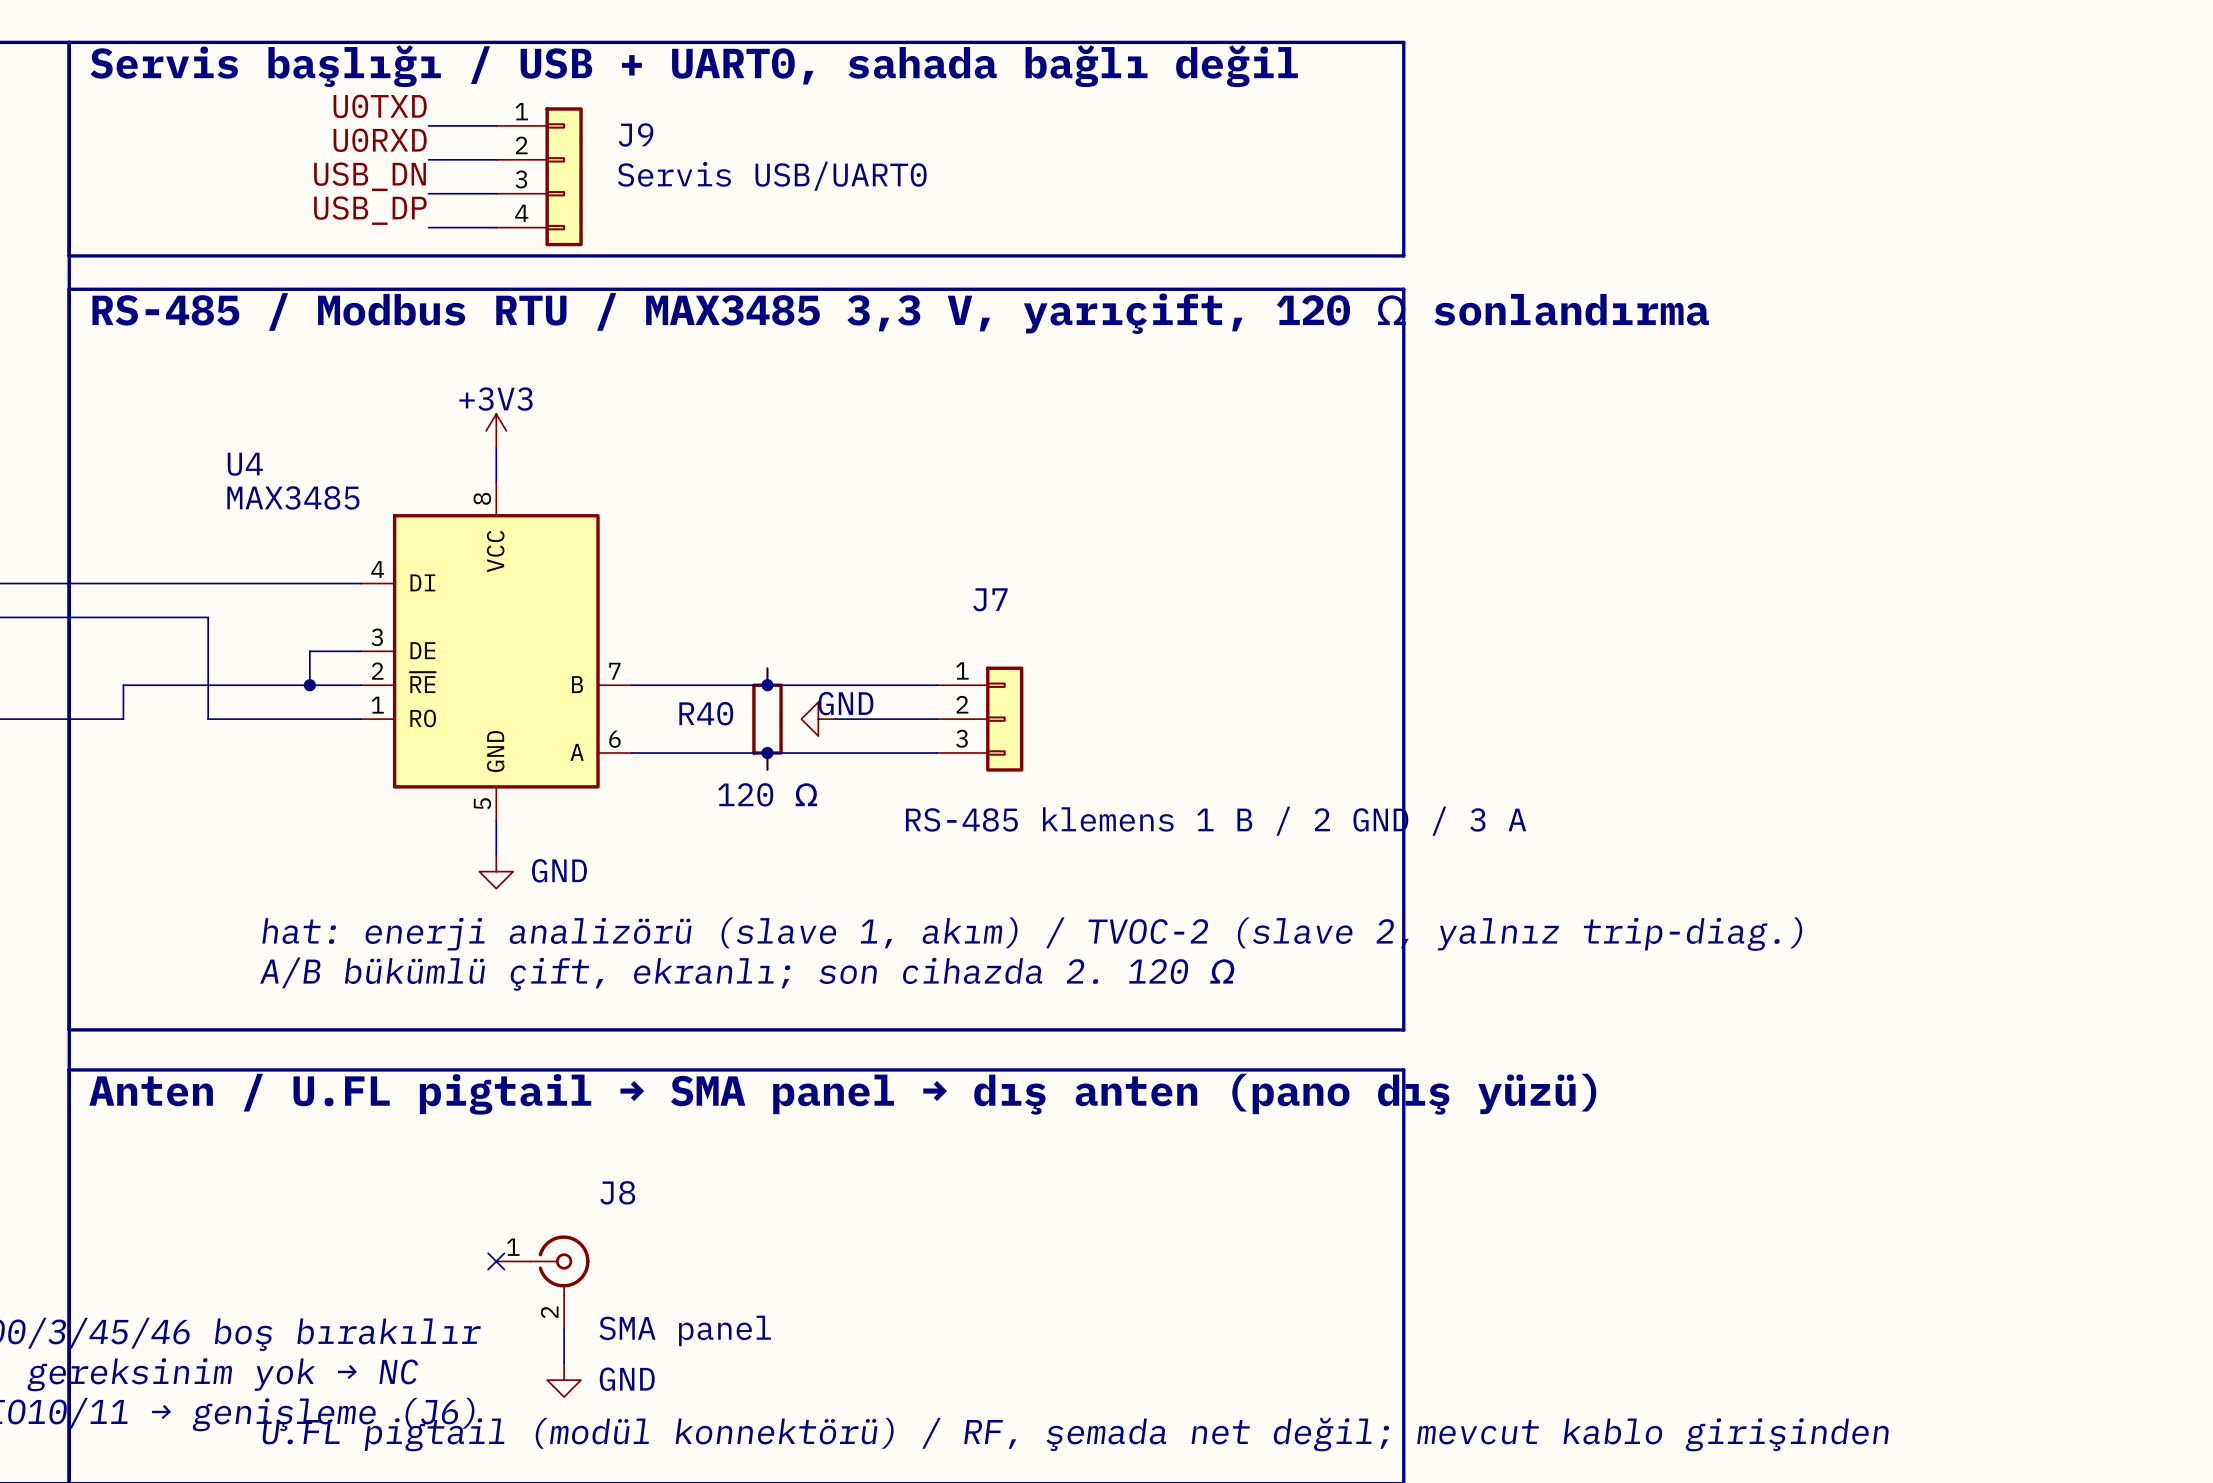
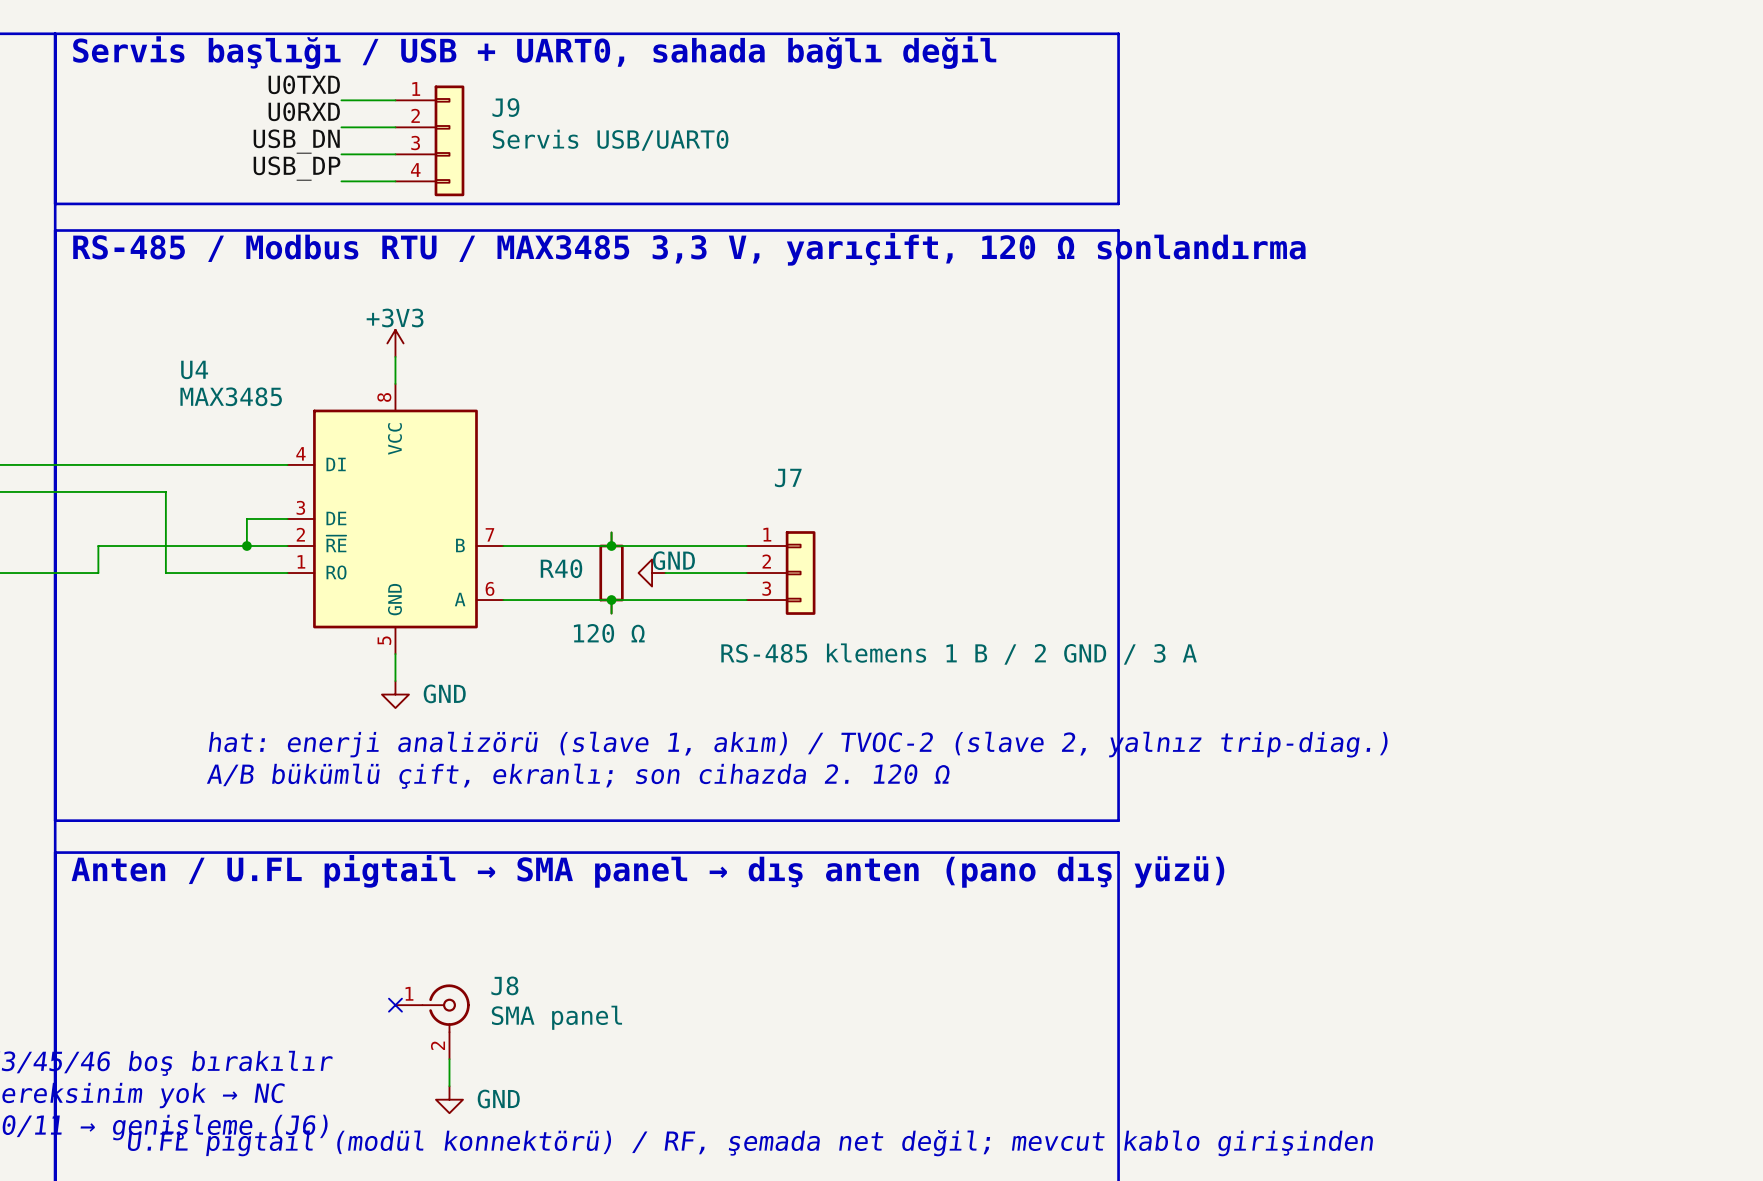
J8 name position: J8 (617, 1192) -> J8 (504, 985)
J8 value position: SMA panel (685, 1330) -> SMA panel (556, 1017)
text position: U.FL pigtail (modül konnektörü) / RF, şemada net değil; mevcut kablo girişinden (1075, 1434) -> U.FL pigtail (modül konnektörü) / RF, şemada net değil; mevcut kablo girişinden (750, 1143)

